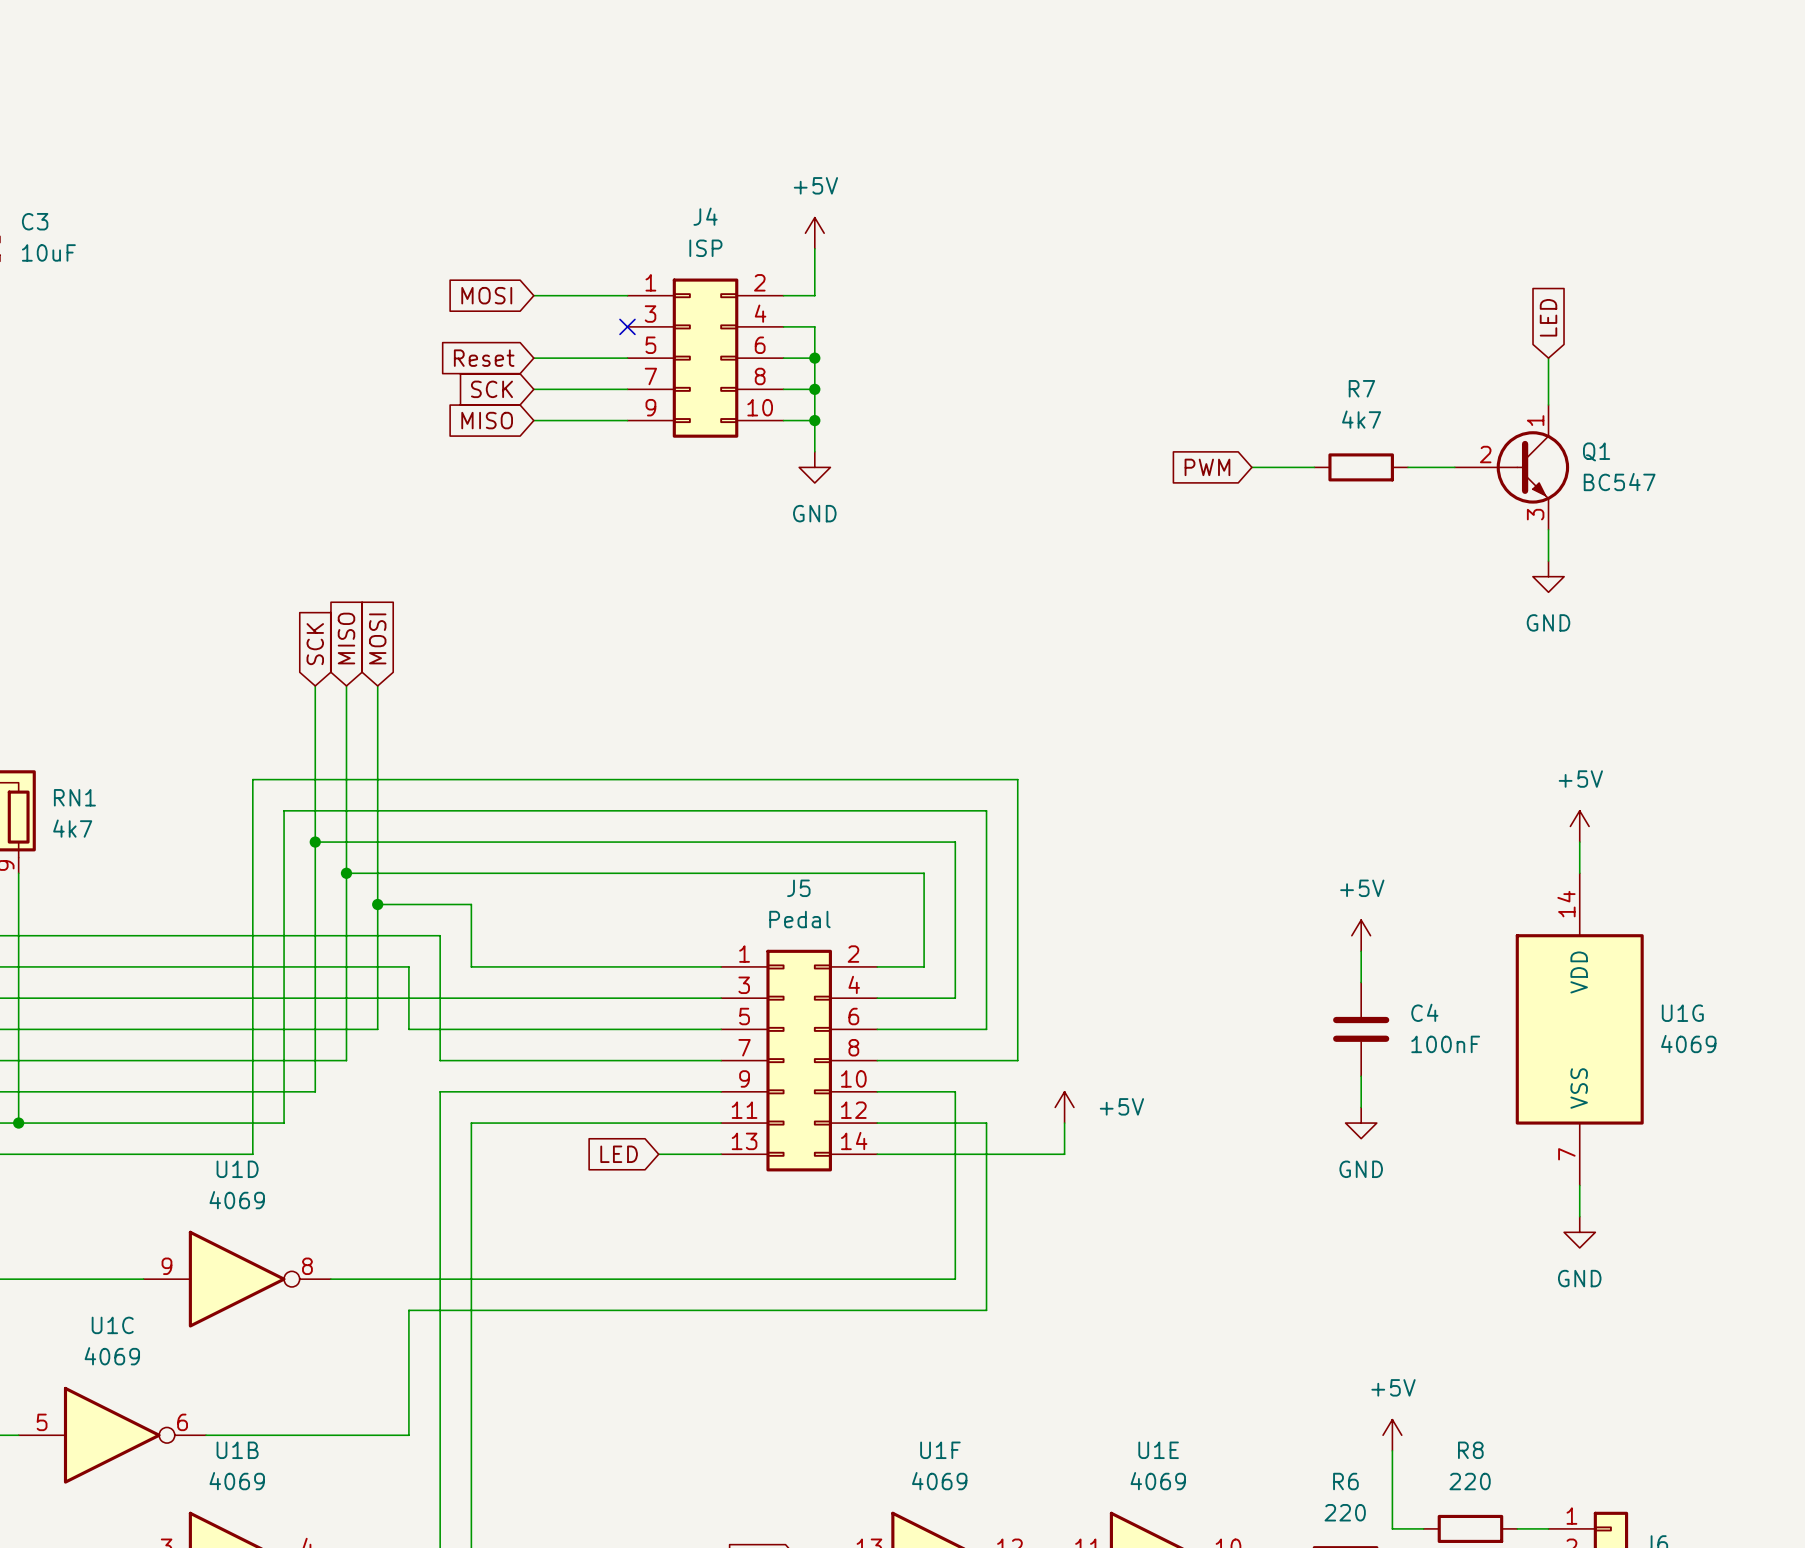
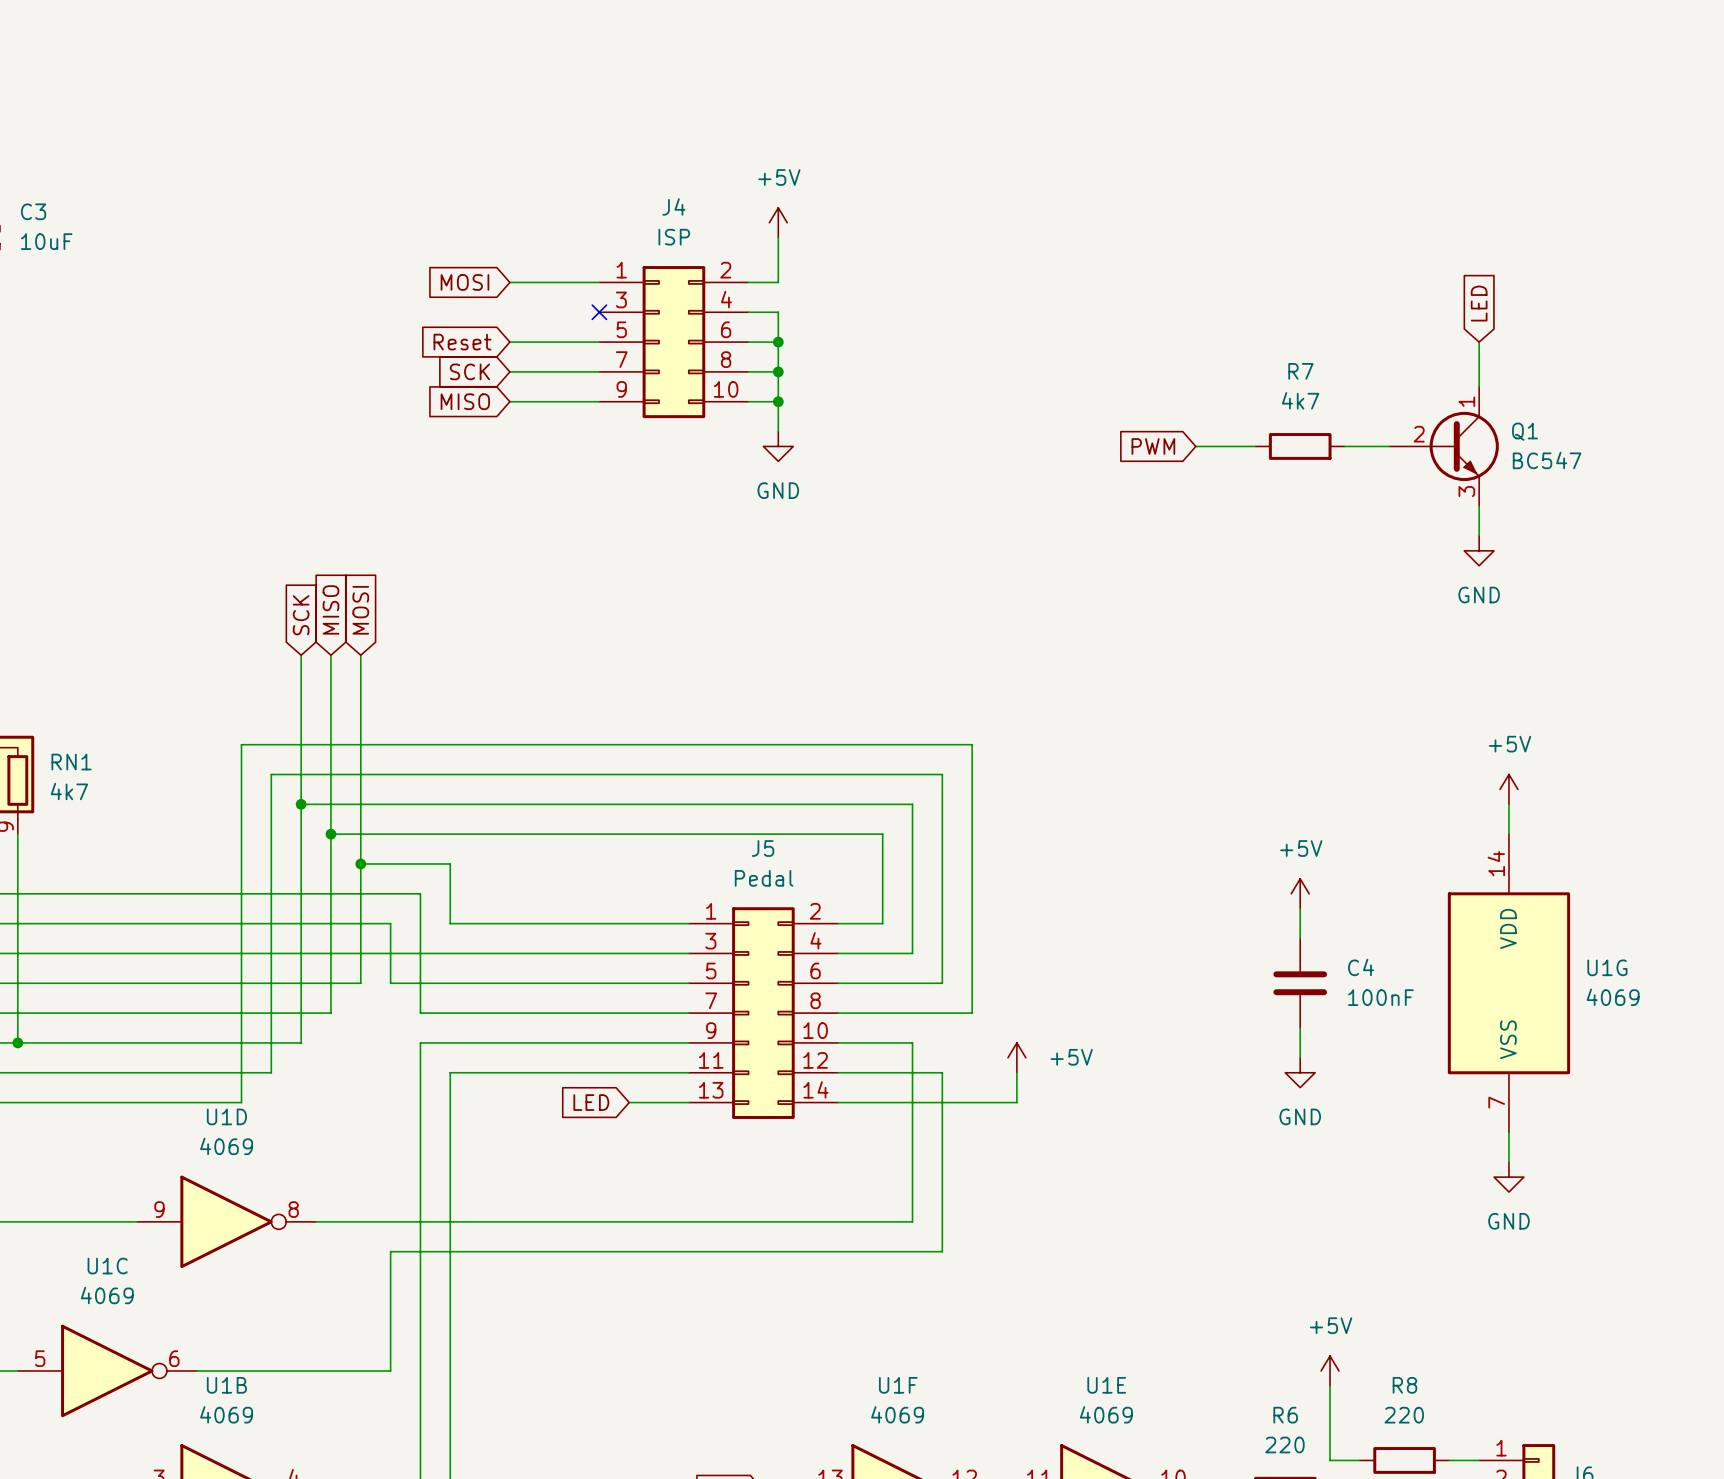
wire: (18, 1091) (18, 1123) -> none
junction: none -> (17, 1042)
junction: (18, 1123) -> none

